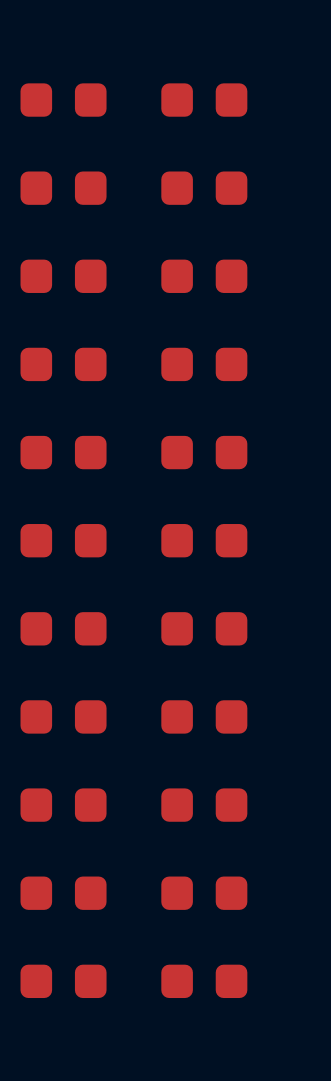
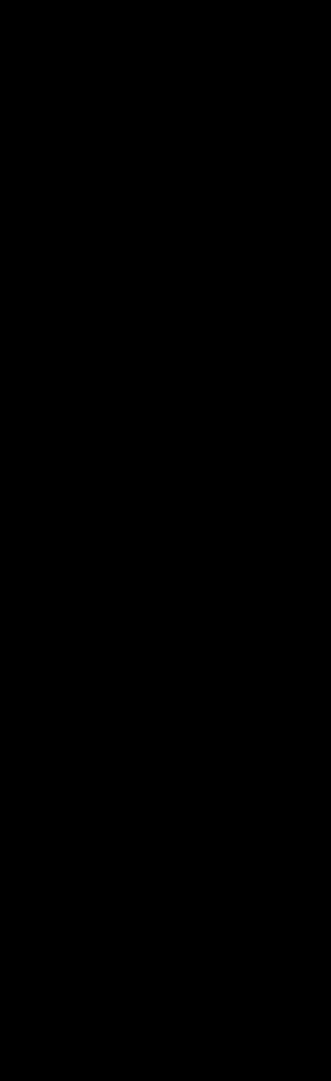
part: (63, 100) -> none
part: (204, 100) -> none
part: (63, 188) -> none
part: (204, 188) -> none
part: (63, 276) -> none
part: (204, 276) -> none
part: (63, 364) -> none
part: (204, 364) -> none
part: (63, 452) -> none
part: (204, 452) -> none
part: (63, 540) -> none
part: (204, 540) -> none
part: (63, 628) -> none
part: (204, 628) -> none
part: (63, 716) -> none
part: (204, 716) -> none
part: (63, 805) -> none
part: (204, 805) -> none
part: (63, 893) -> none
part: (204, 893) -> none
part: (63, 981) -> none
part: (204, 981) -> none

